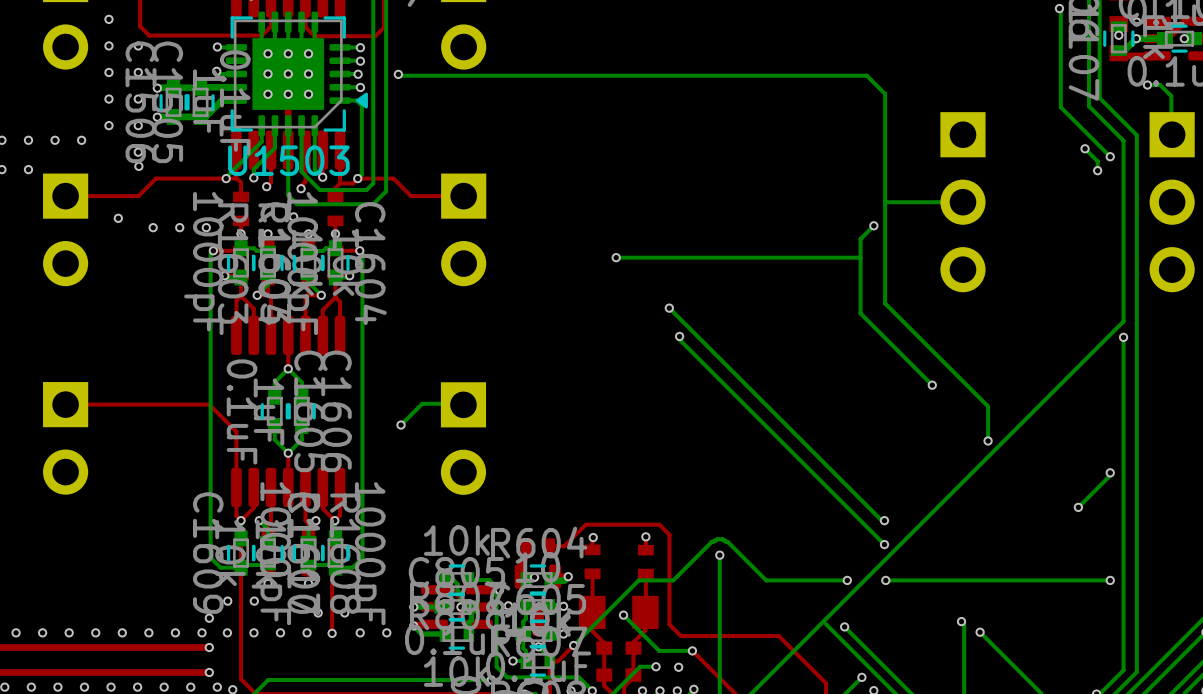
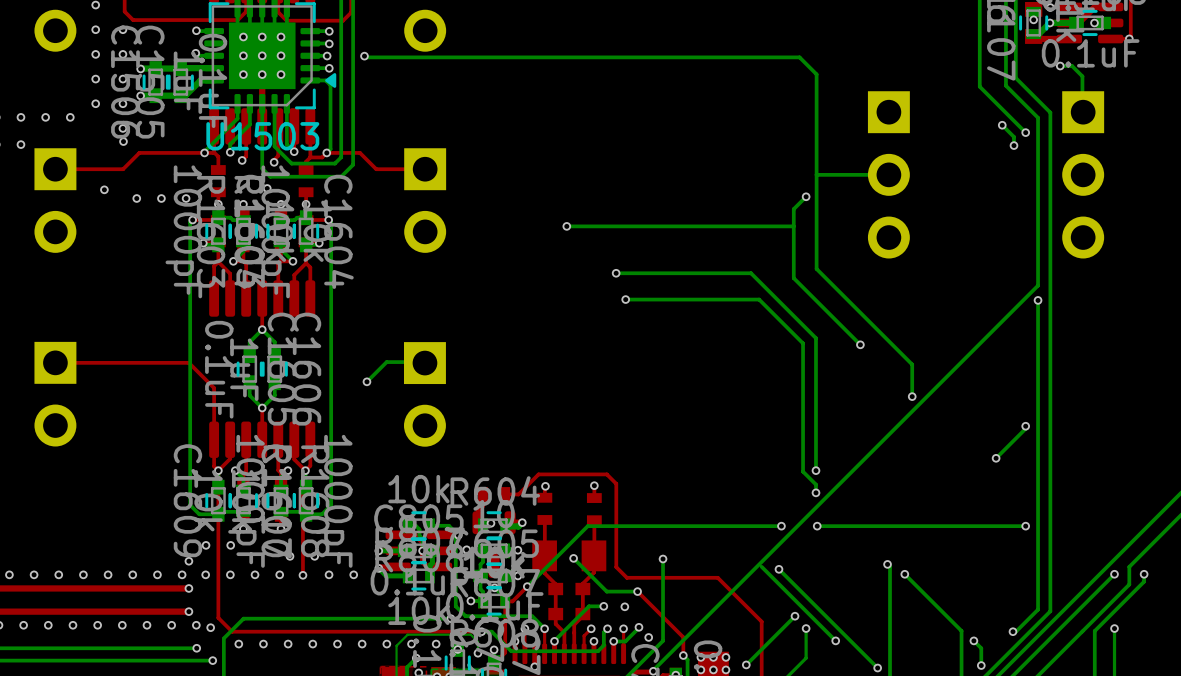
bottom track: (669, 308) (881, 520) (884, 520) -> (616, 273) (751, 273) (815, 338) (815, 470)
bottom track: (679, 336) (679, 339) (884, 544) -> (625, 299) (759, 299) (803, 343) (803, 471) (815, 484) (815, 492)
bottom track: (719, 555) (719, 615) -> none
via position: (719, 555) -> (663, 559)
bottom track: (766, 580) (727, 541) (722, 539) (711, 541) (673, 580) -> (706, 526) (619, 526)

